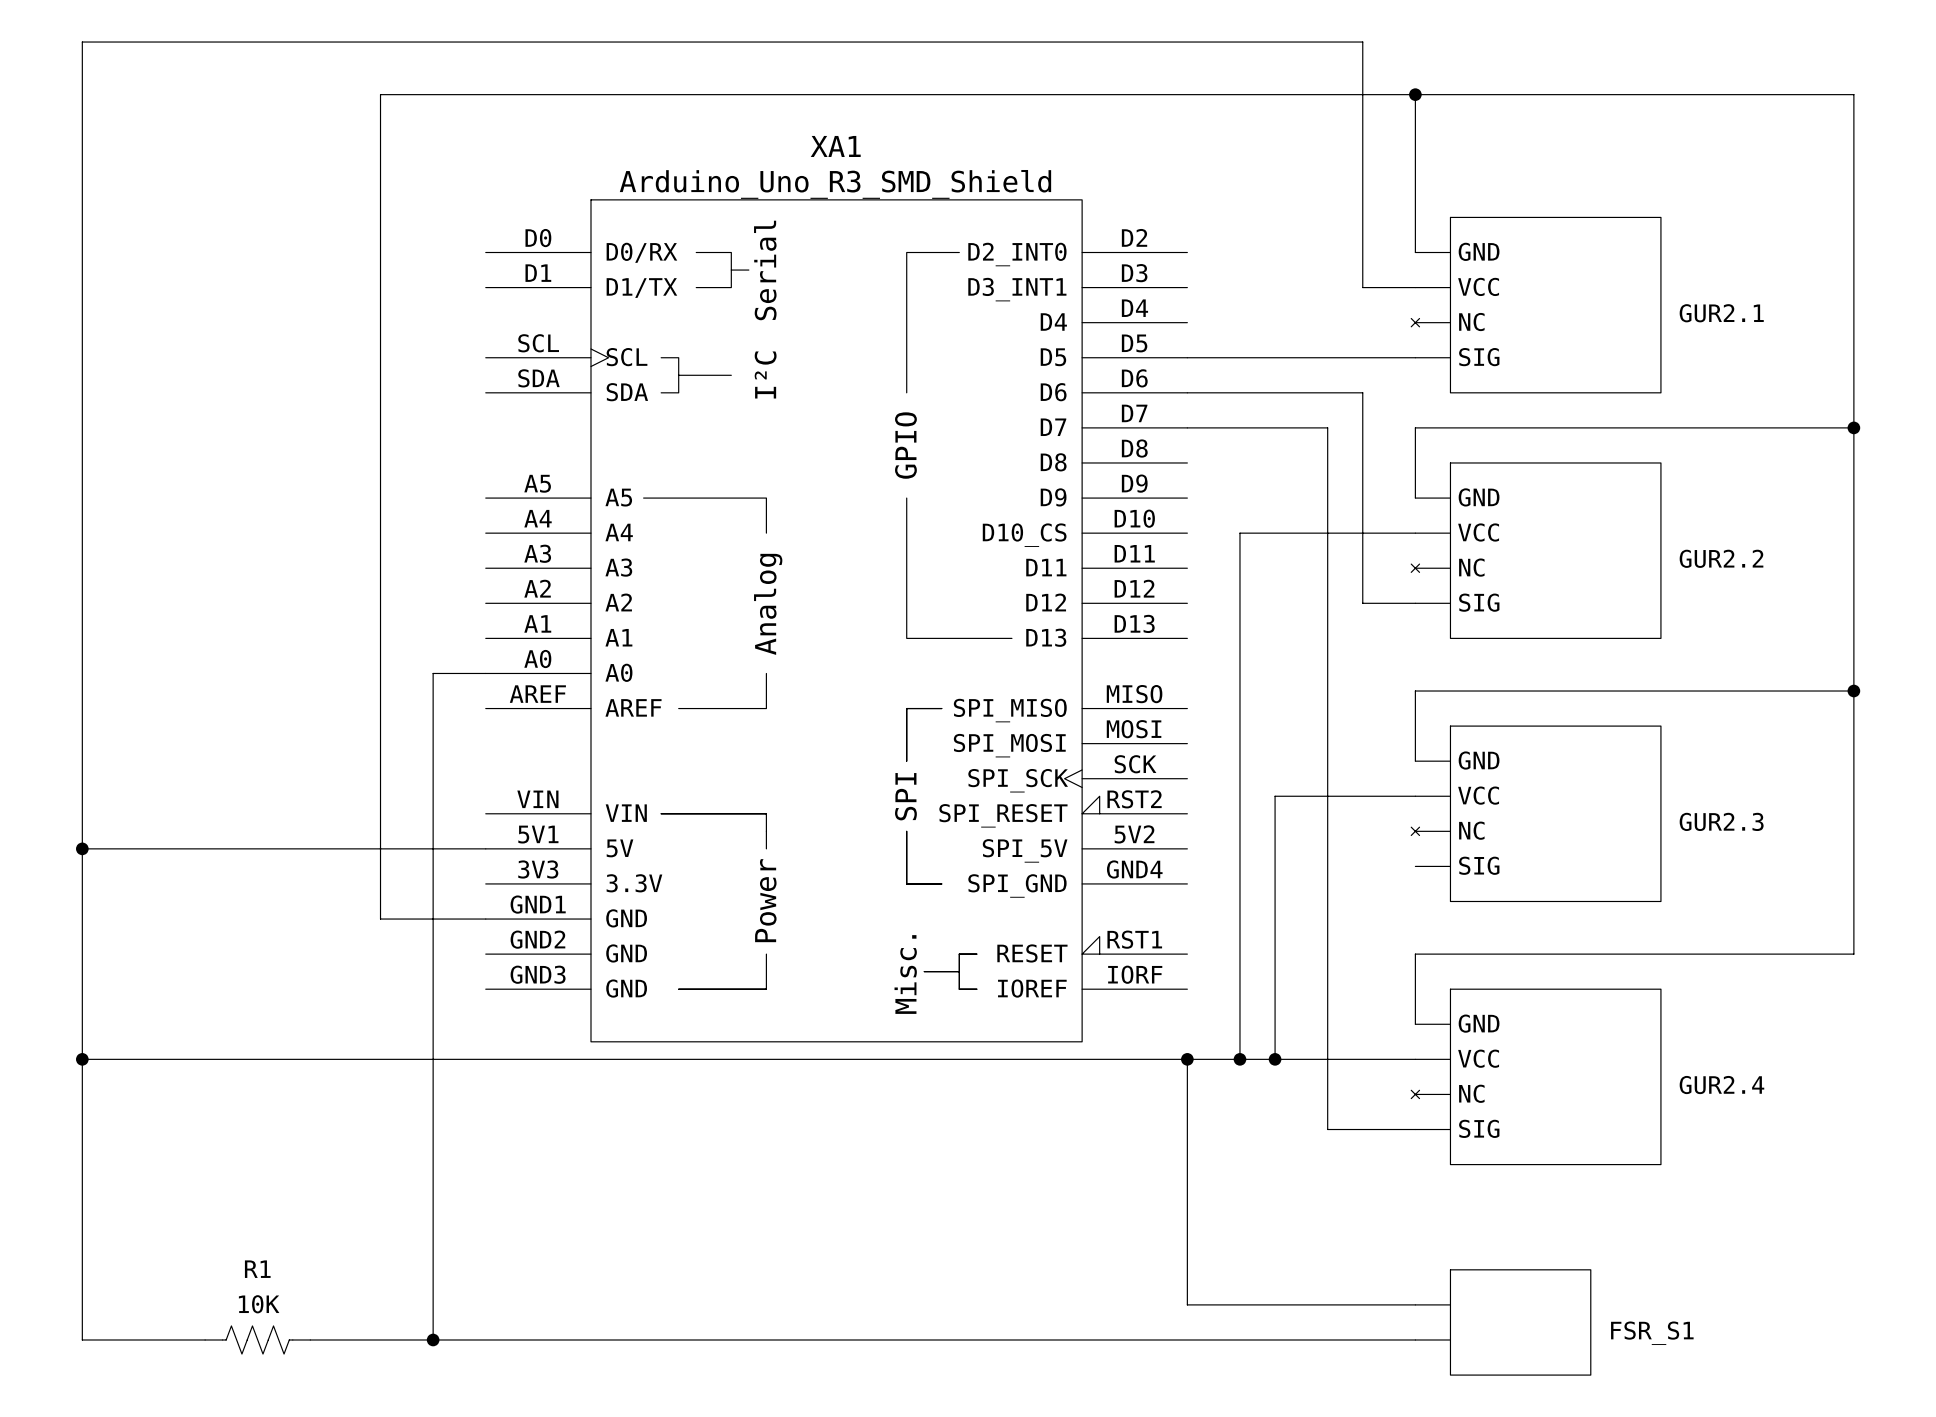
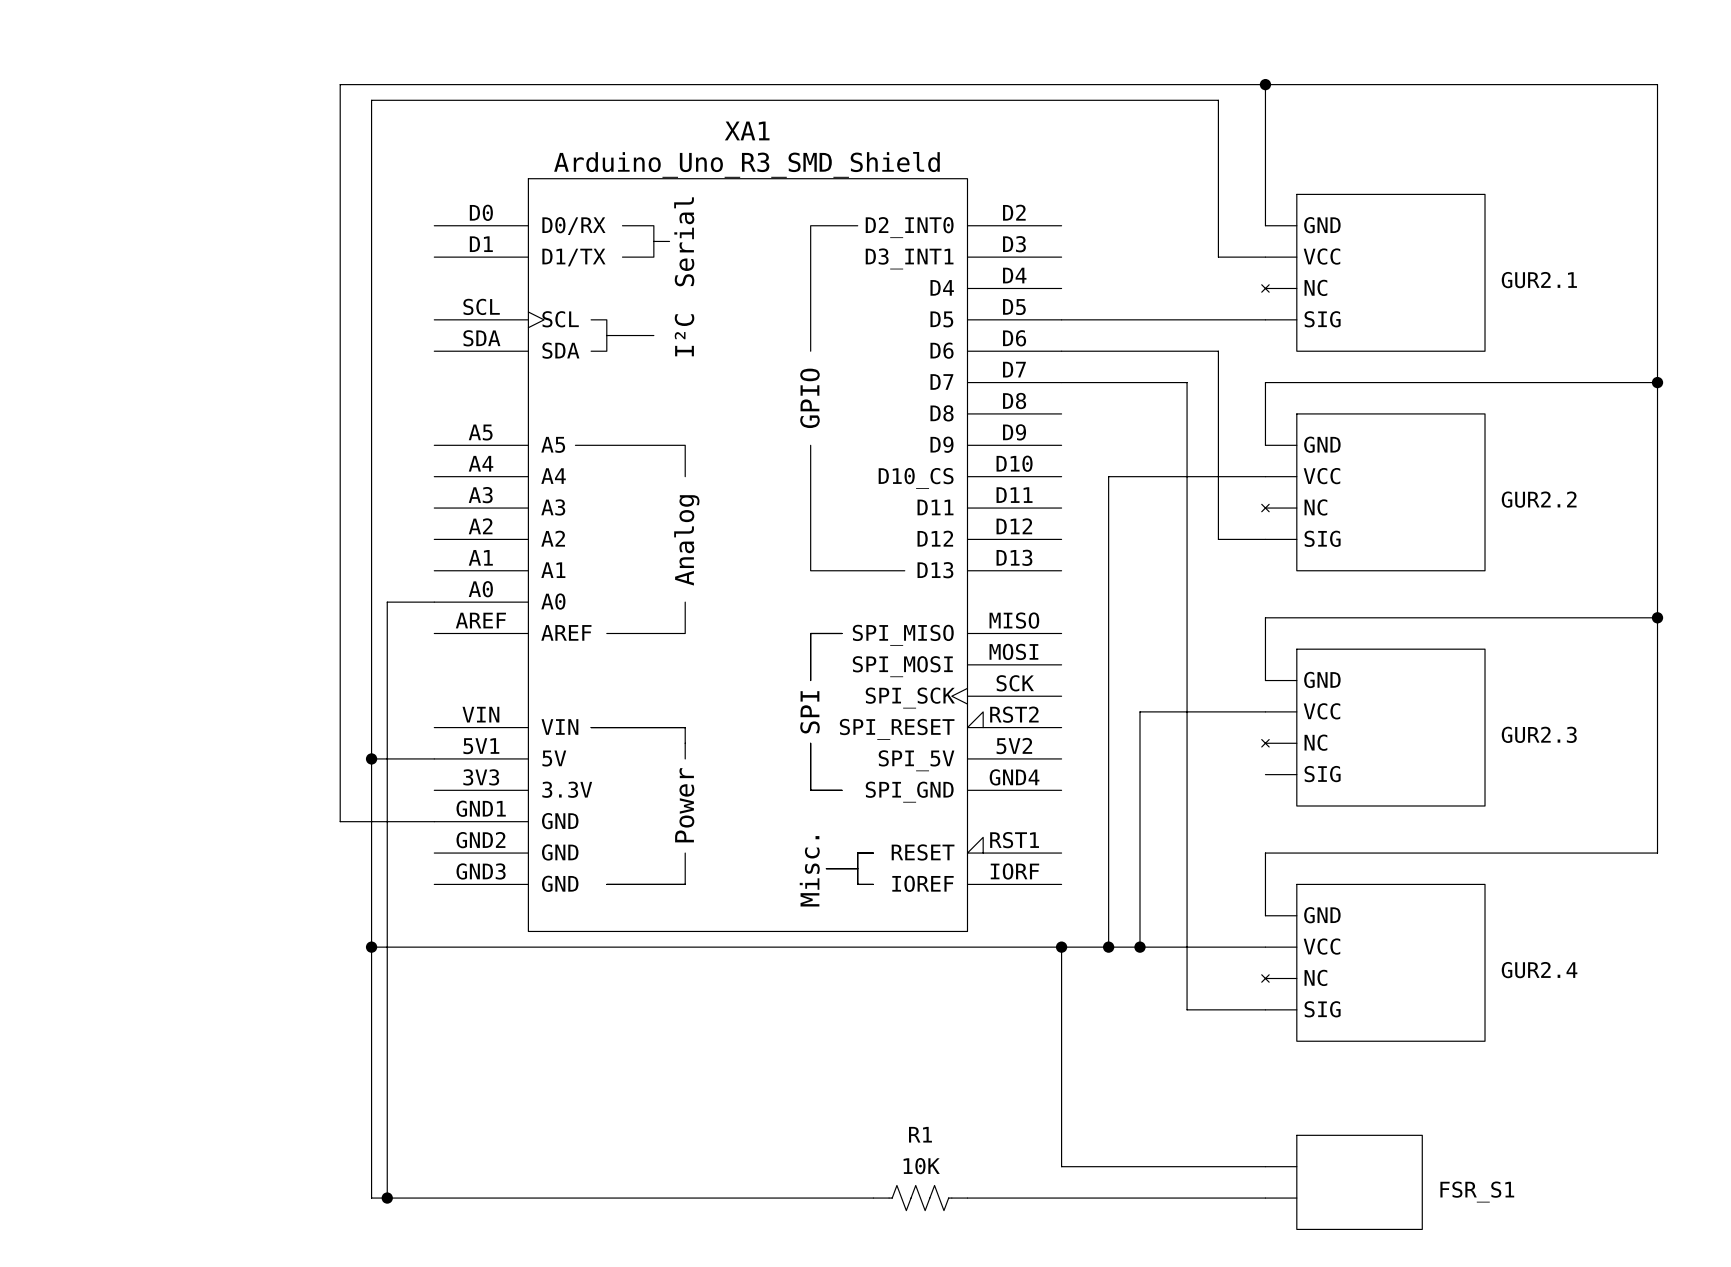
wire: (1362, 112) (1362, 42) (82, 42) (82, 1339) (205, 1339) -> (1218, 100) (371, 100) (371, 1198)
wire: (82, 848) (415, 848) -> none
junction: (82, 848) -> none
junction: none -> (371, 758)
wire: (82, 1059) (415, 1059) -> none
junction: (82, 1059) -> none
junction: none -> (371, 947)
R1 position: (257, 1339) -> (920, 1198)
wire: (310, 1339) (415, 1339) -> none
wire: (976, 1339) (1082, 1339) -> none

